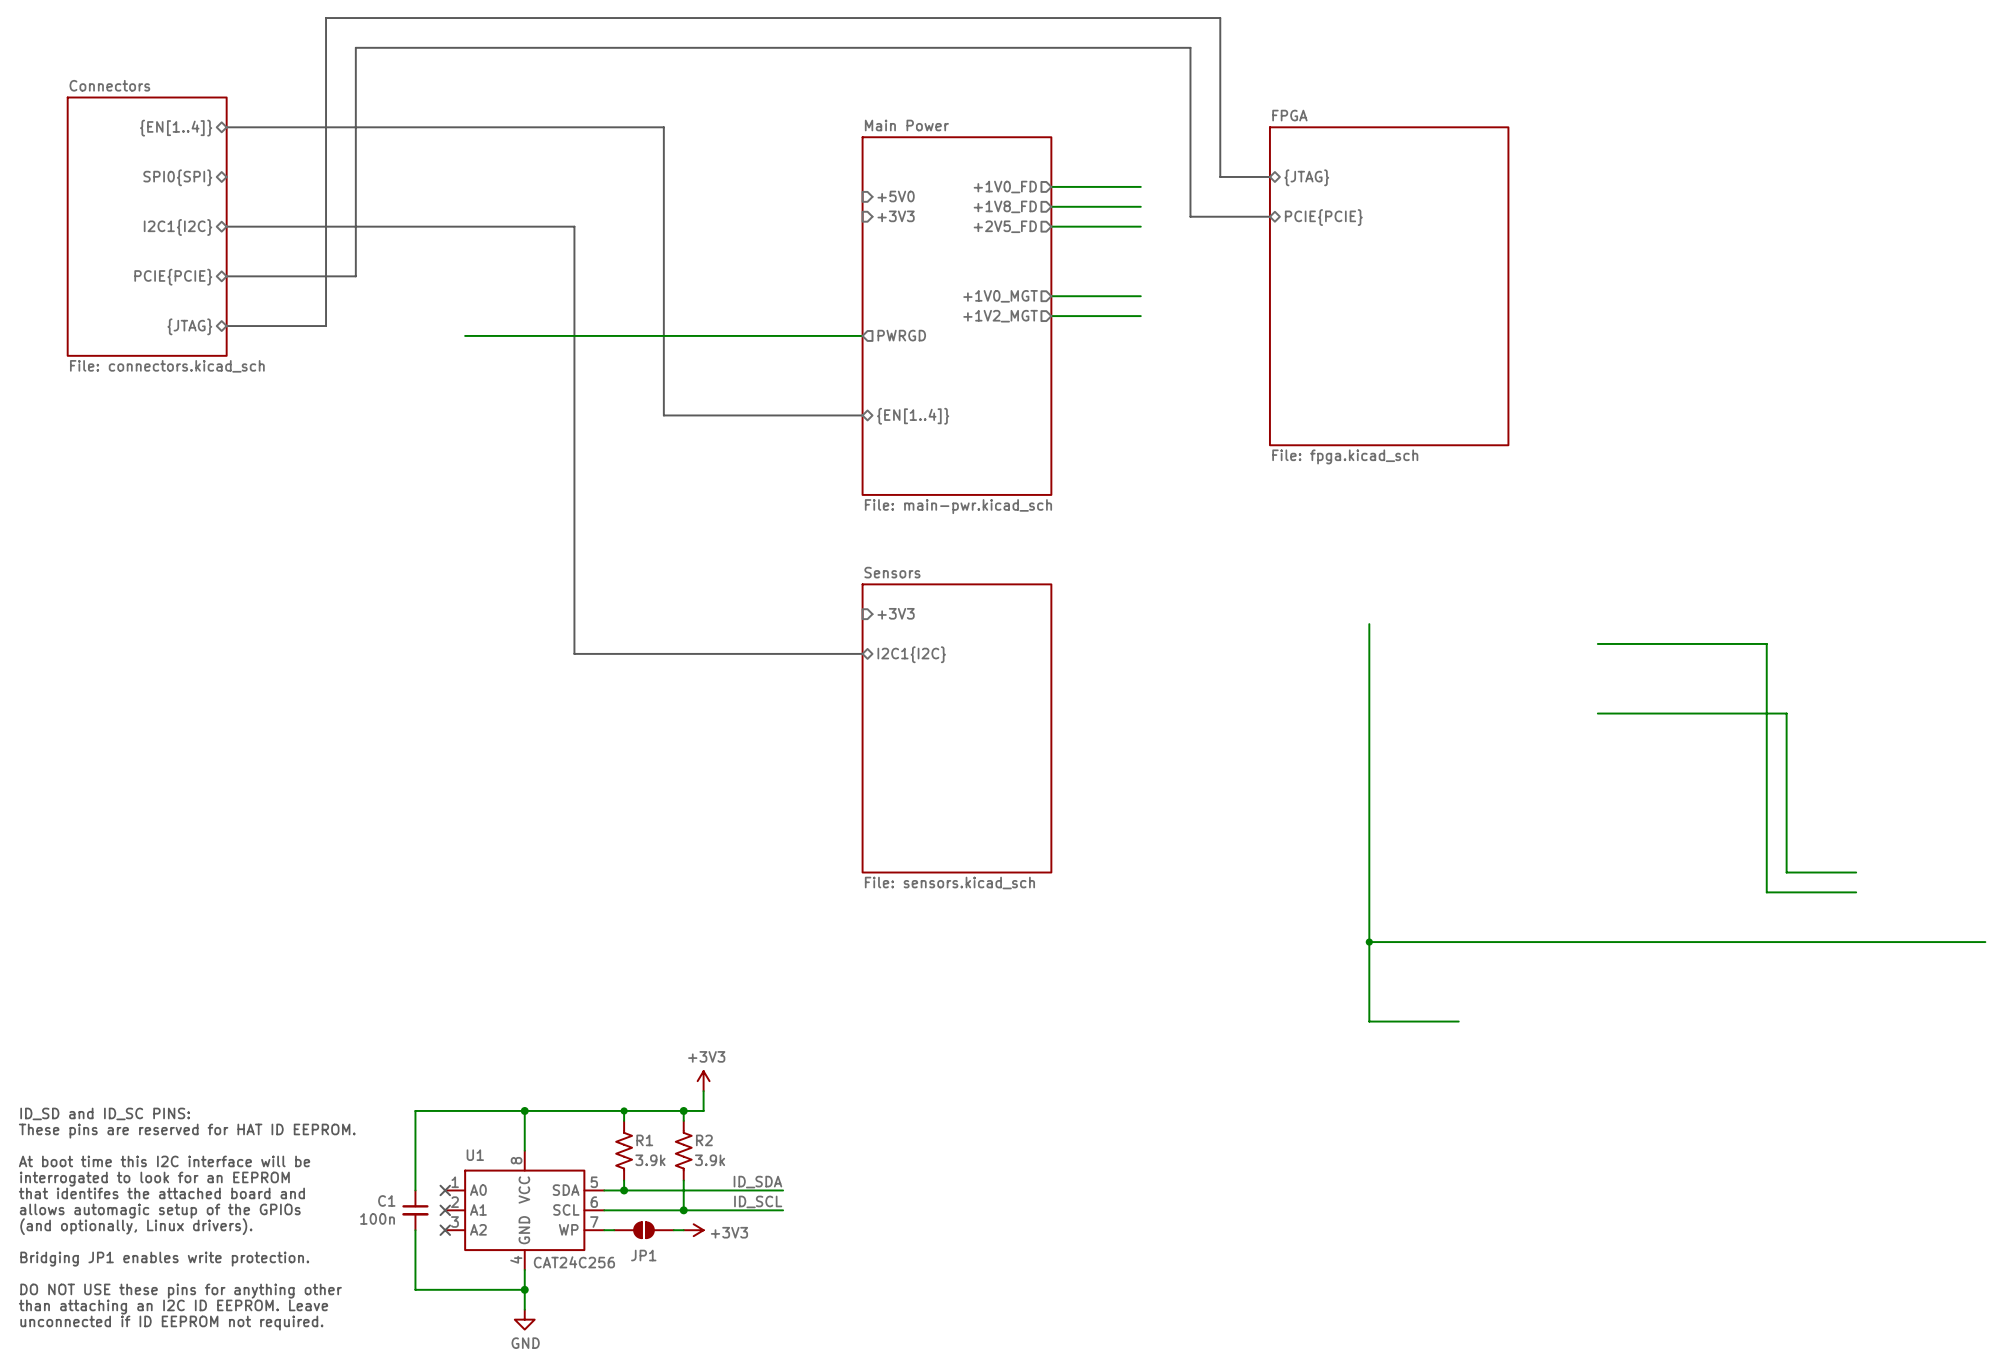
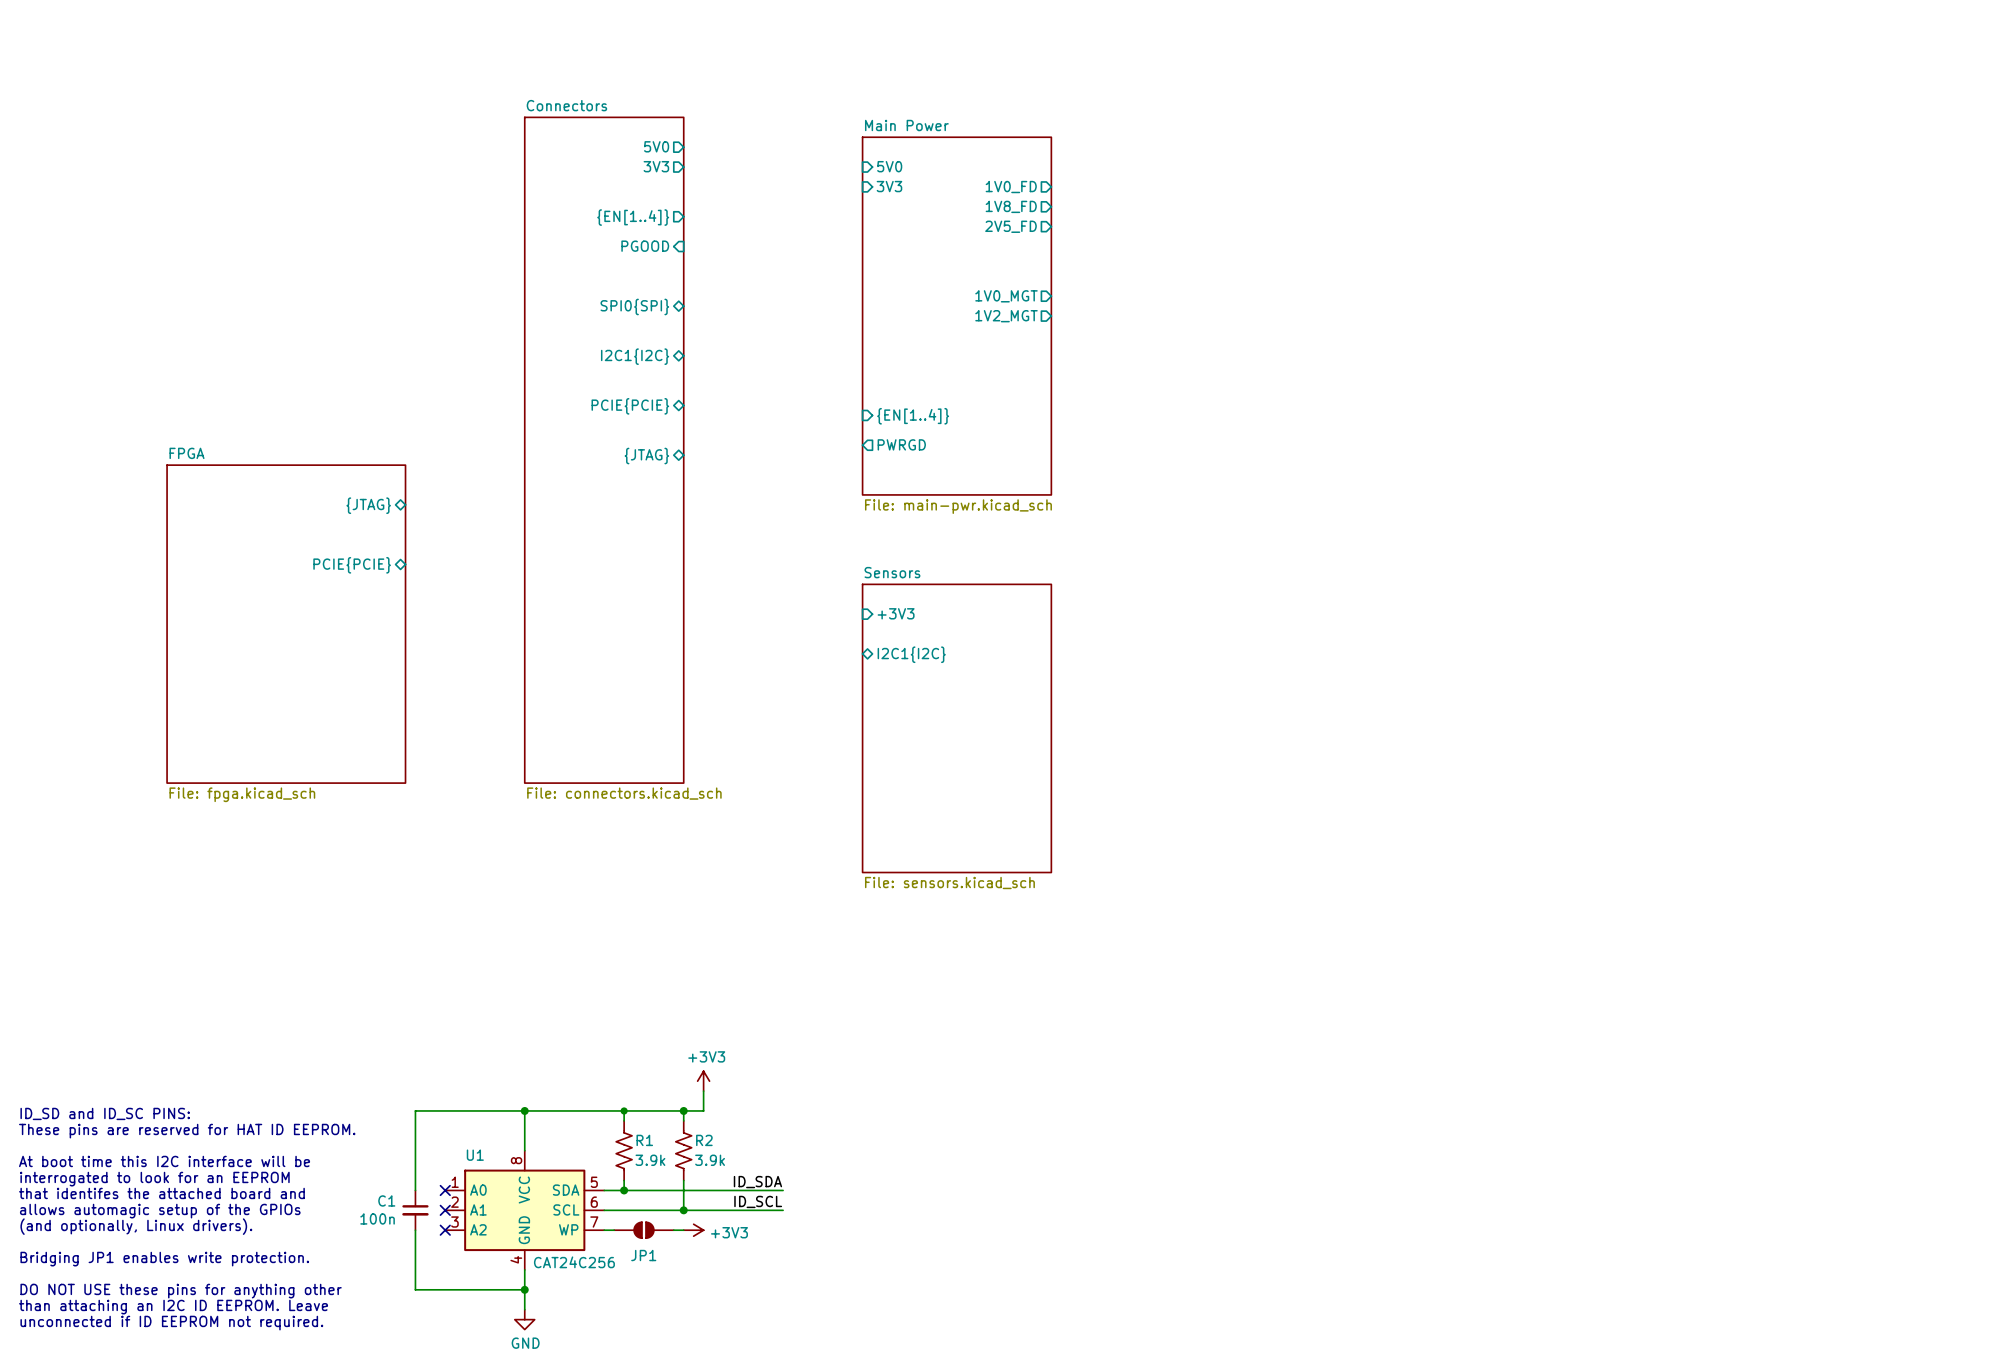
bus: (226, 127) (663, 127) (663, 415) (862, 415) -> none
sheet pin: {EN[1..4]} (176, 128) -> none
sheet pin: none -> 5V0 (656, 146)
sheet pin: none -> 3V3 (656, 166)
sheet pin: none -> 5V0 (889, 166)
bus: (1269, 176) (1220, 176) (1220, 18) (326, 18) (326, 326) (226, 326) -> none
sheet pin: SPI0{SPI} (177, 177) -> none
sheet pin: {JTAG} (1306, 177) -> none
sheet pin: none -> 3V3 (889, 186)
wire: (1051, 186) (1140, 186) -> none
sheet pin: +1V0_FD (1005, 187) -> 1V0_FD (1011, 187)
sheet pin: +5V0 (896, 196) -> none
sheet pin: +1V8_FD (1005, 206) -> 1V8_FD (1011, 206)
wire: (1051, 206) (1140, 206) -> none
sheet pin: +3V3 (896, 216) -> none
bus: (1269, 216) (1190, 216) (1190, 47) (355, 47) (355, 276) (226, 276) -> none
sheet pin: none -> {EN[1..4]} (633, 217)
sheet pin: PCIE{PCIE} (1323, 217) -> none
sheet Connectors: File: connectors.kicad_sch (147, 226) -> none
bus: (226, 226) (574, 226) (574, 653) (862, 653) -> none
sheet pin: +2V5_FD (1005, 226) -> 2V5_FD (1010, 226)
wire: (1051, 226) (1140, 226) -> none
sheet pin: I2C1{I2C} (178, 227) -> none
sheet pin: none -> PGOOD (645, 246)
sheet pin: PCIE{PCIE} (173, 277) -> none
sheet FPGA: File: fpga.kicad_sch (1389, 286) -> none
sheet pin: +1V0_MGT (1000, 296) -> 1V0_MGT (1006, 296)
wire: (1051, 296) (1140, 296) -> none
sheet pin: none -> SPI0{SPI} (634, 306)
sheet pin: +1V2_MGT (1000, 316) -> 1V2_MGT (1006, 316)
wire: (1051, 316) (1140, 316) -> none
sheet pin: {JTAG} (189, 326) -> none
wire: (465, 335) (862, 335) -> none
sheet pin position: PWRGD (901, 335) -> PWRGD (901, 444)
sheet pin: none -> I2C1{I2C} (635, 356)
sheet pin: none -> PCIE{PCIE} (630, 406)
sheet pin shape: bidirectional (913, 416) -> input (913, 416)
sheet Connectors: none -> File: connectors.kicad_sch (604, 450)
sheet pin: none -> {JTAG} (646, 456)
sheet pin: none -> {JTAG} (368, 505)
sheet pin: none -> PCIE{PCIE} (352, 565)
sheet FPGA: none -> File: fpga.kicad_sch (286, 624)
wire: (1369, 624) (1369, 1021) (1458, 1021) -> none
wire: (1597, 643) (1766, 643) (1766, 892) (1856, 892) -> none
wire: (1597, 713) (1786, 713) (1786, 872) (1856, 872) -> none
wire: (1369, 942) (1985, 942) -> none
junction: (1369, 942) -> none

